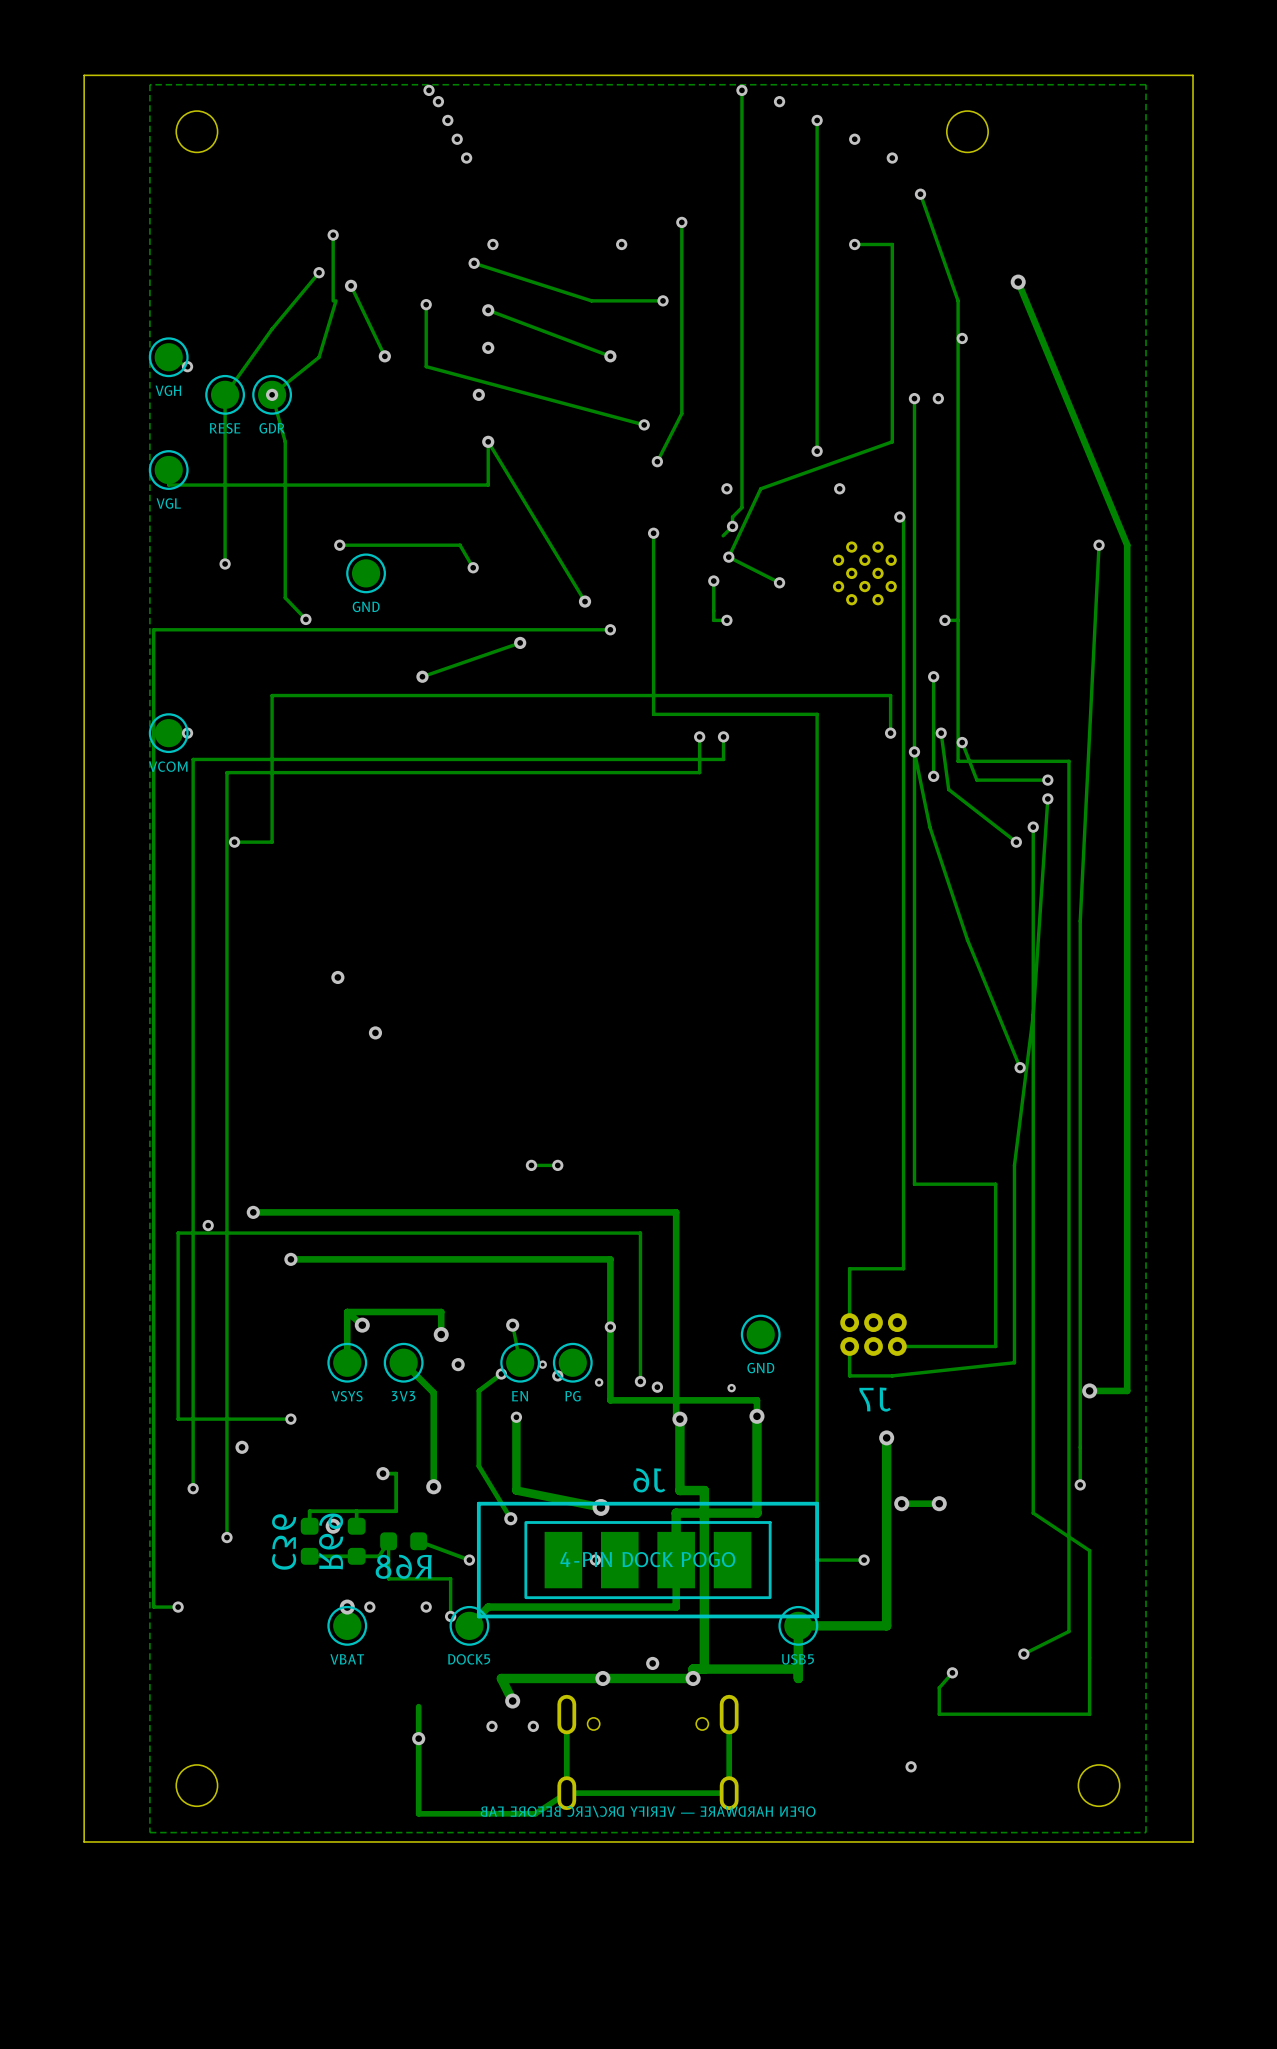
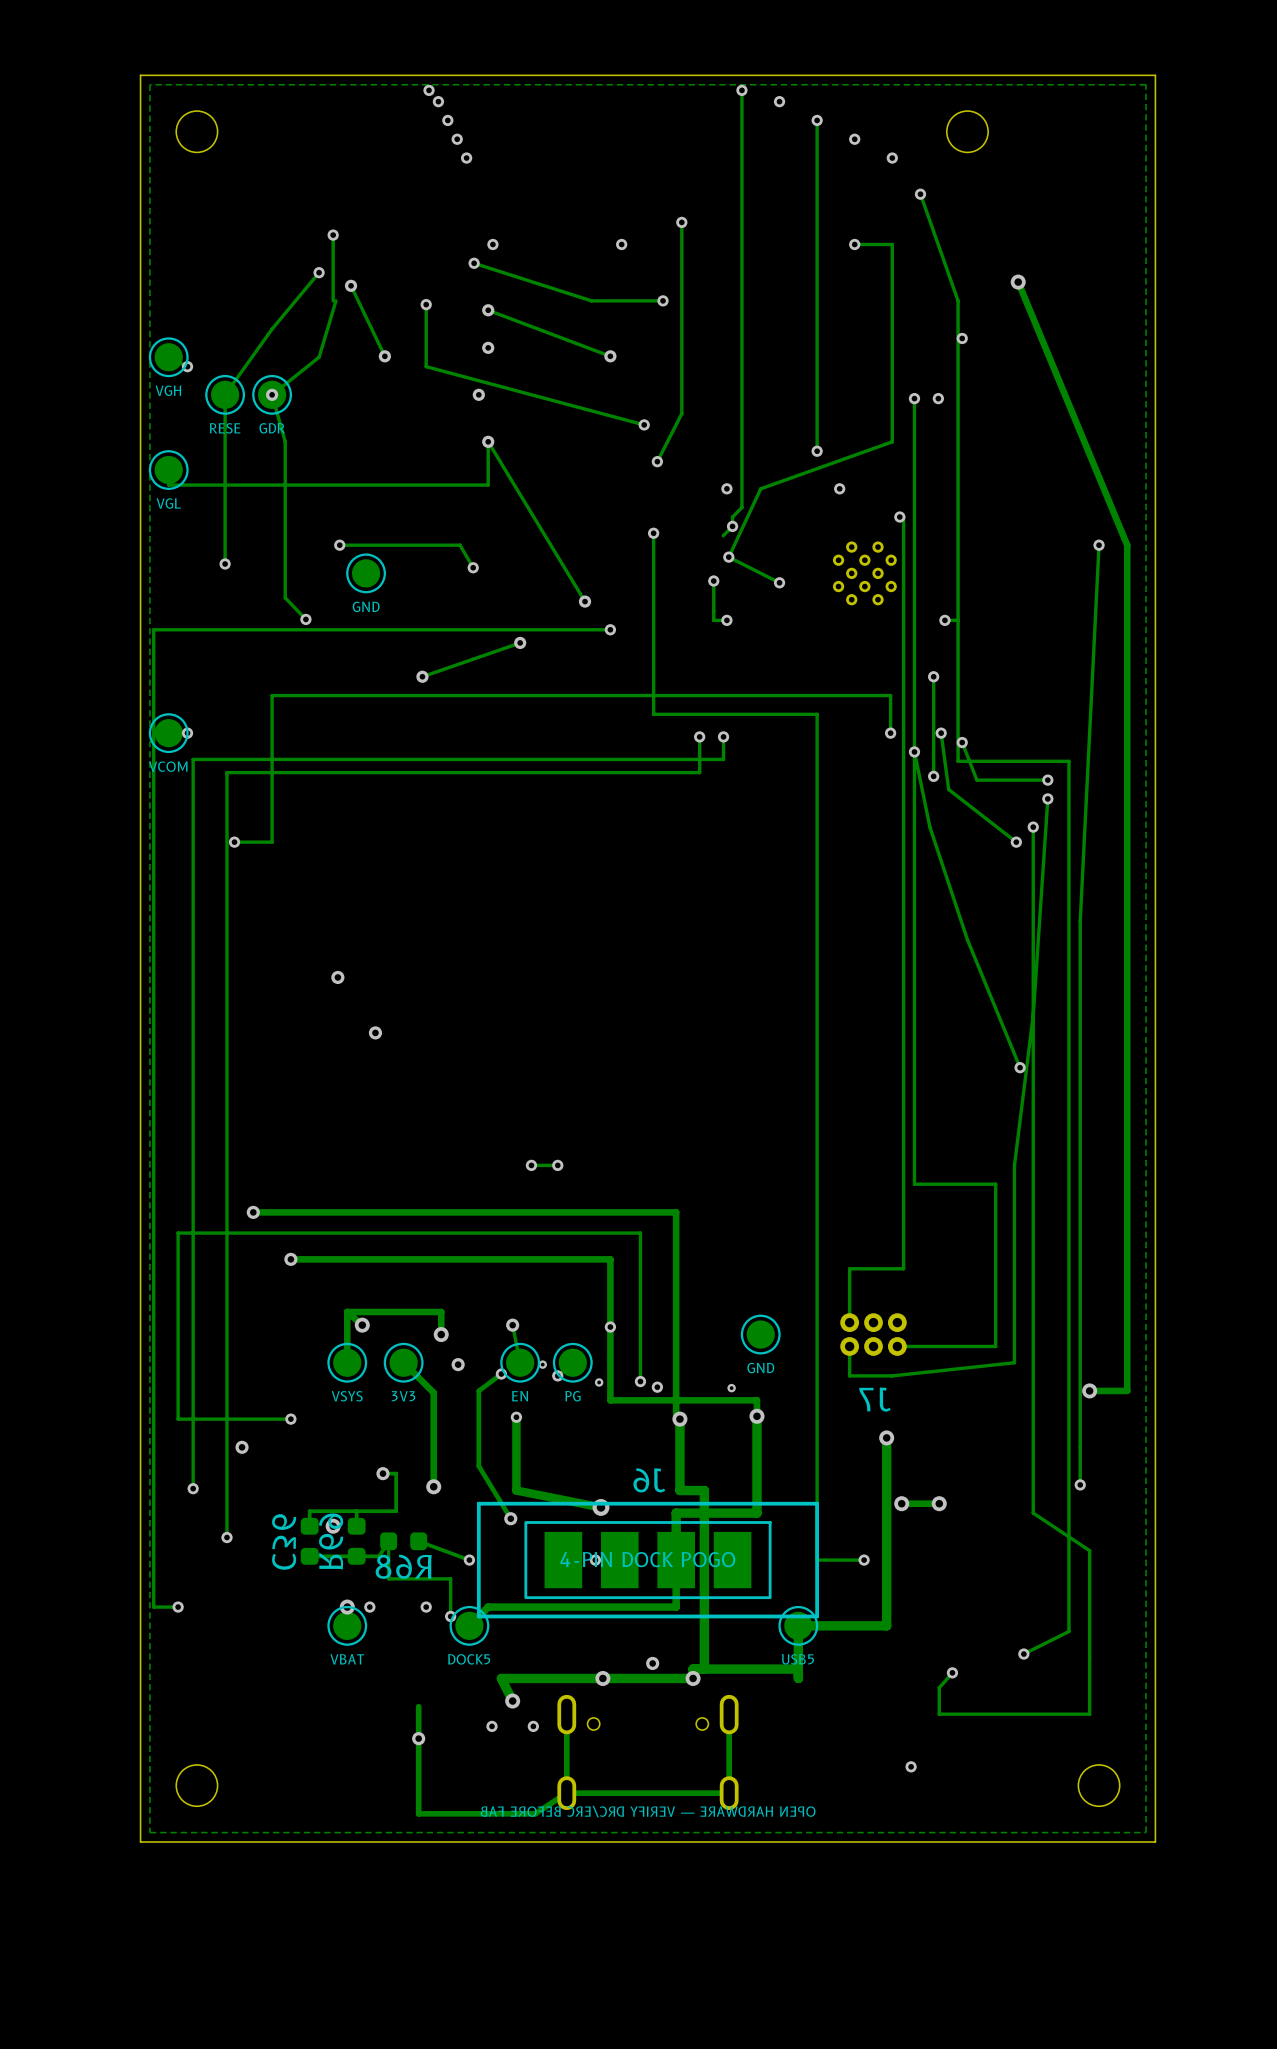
board edge: (140, 75) (84, 75) (84, 1841) (140, 1841) -> (140, 75) (140, 1841)
board edge: (1155, 75) (1193, 75) (1193, 1841) (1155, 1841) -> (1155, 75) (1155, 1841)
via: (208, 1225) -> none

